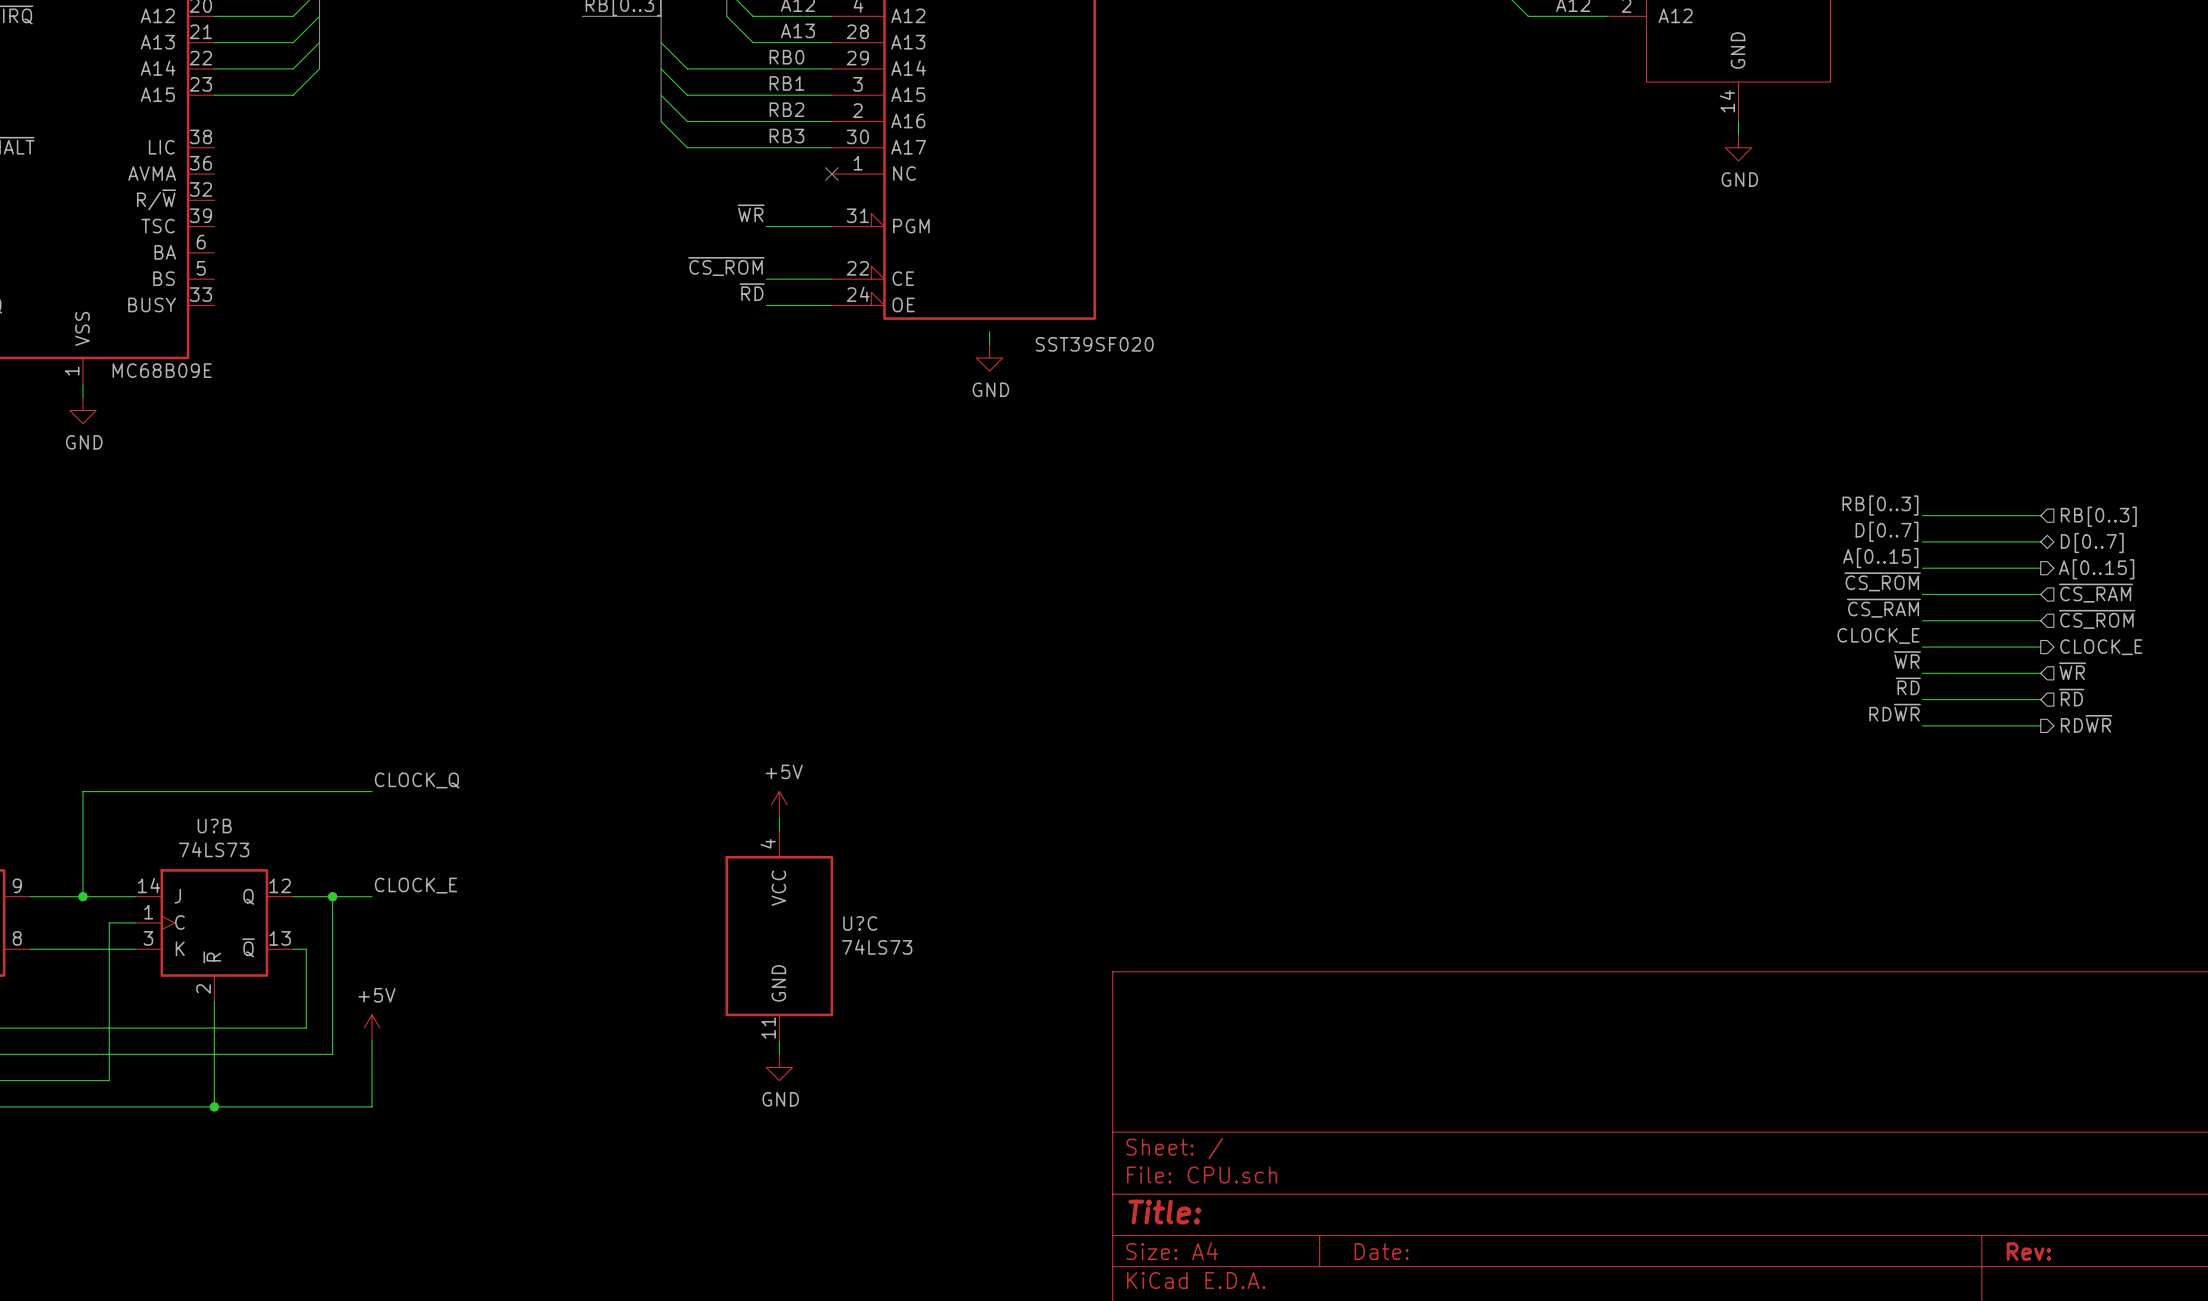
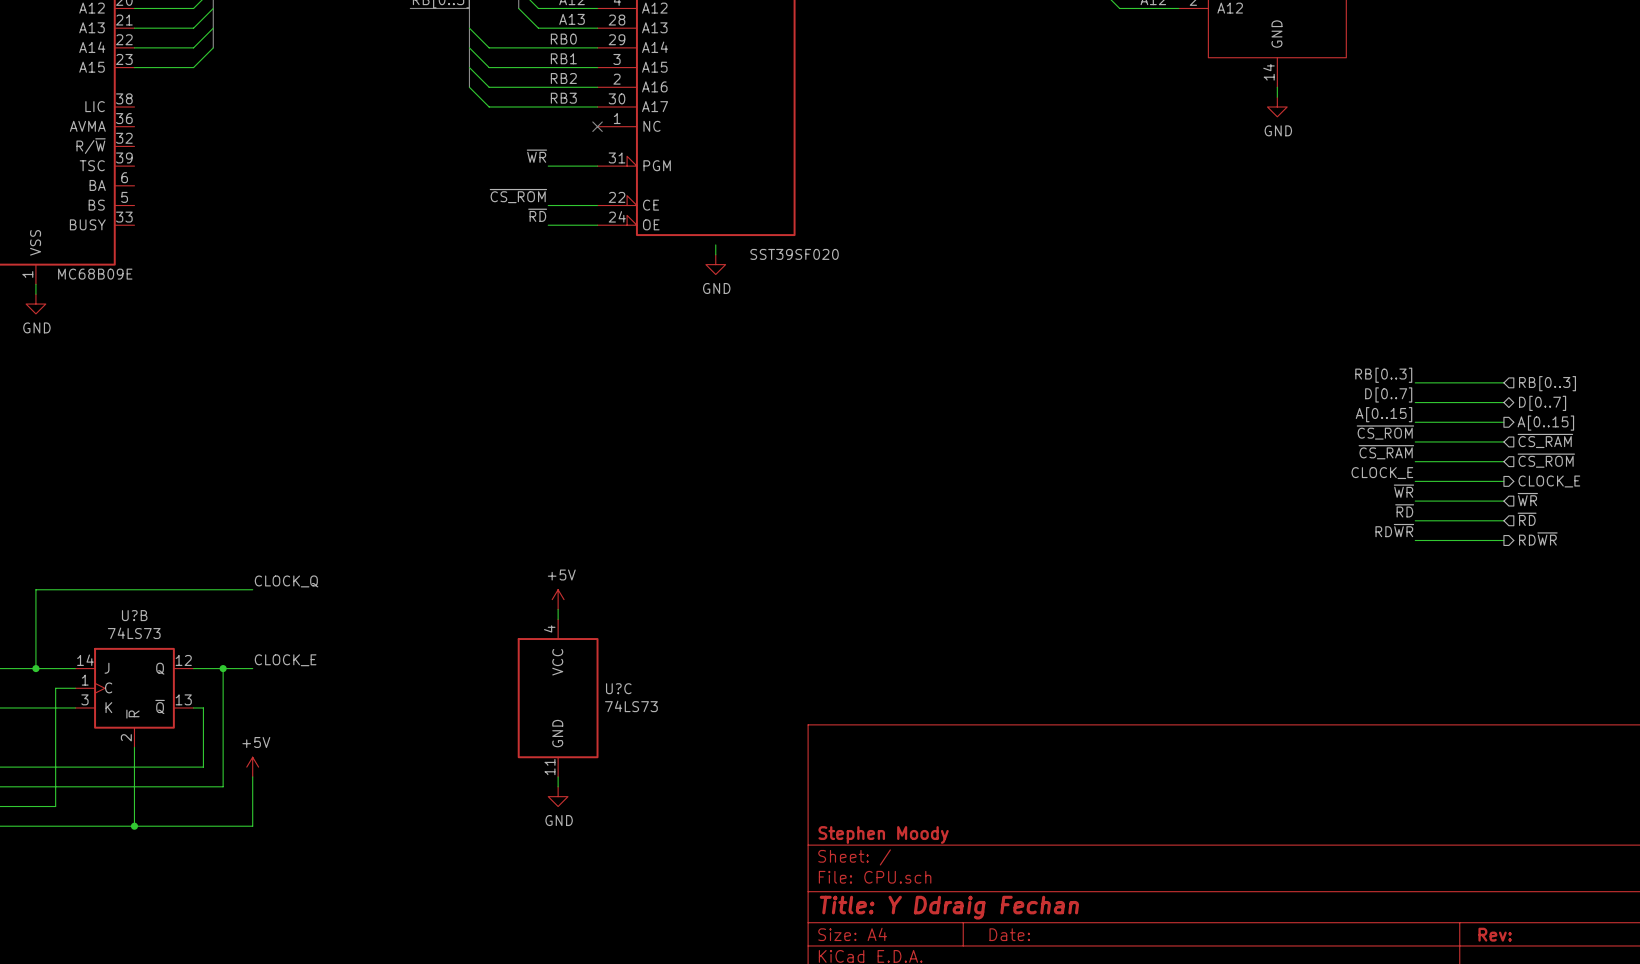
title block: none -> Stephen Moody (883, 834)
title block: Title: (1164, 1212) -> Title: Y Ddraig Fechan (949, 907)

